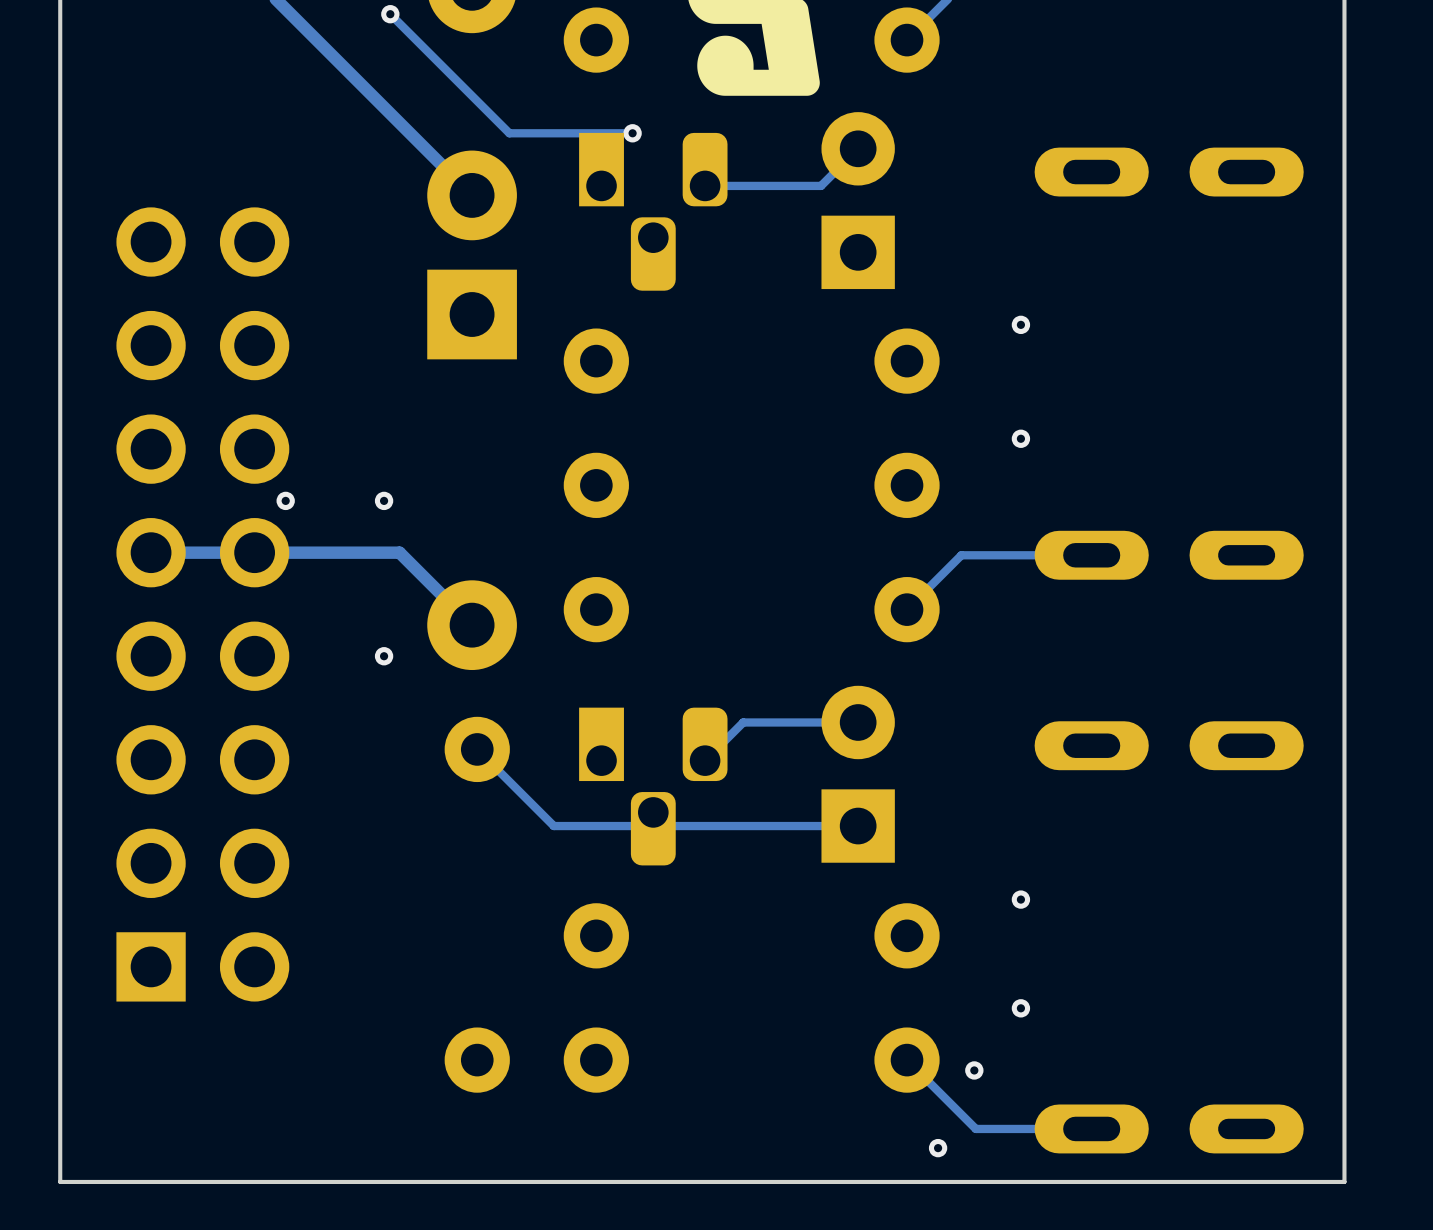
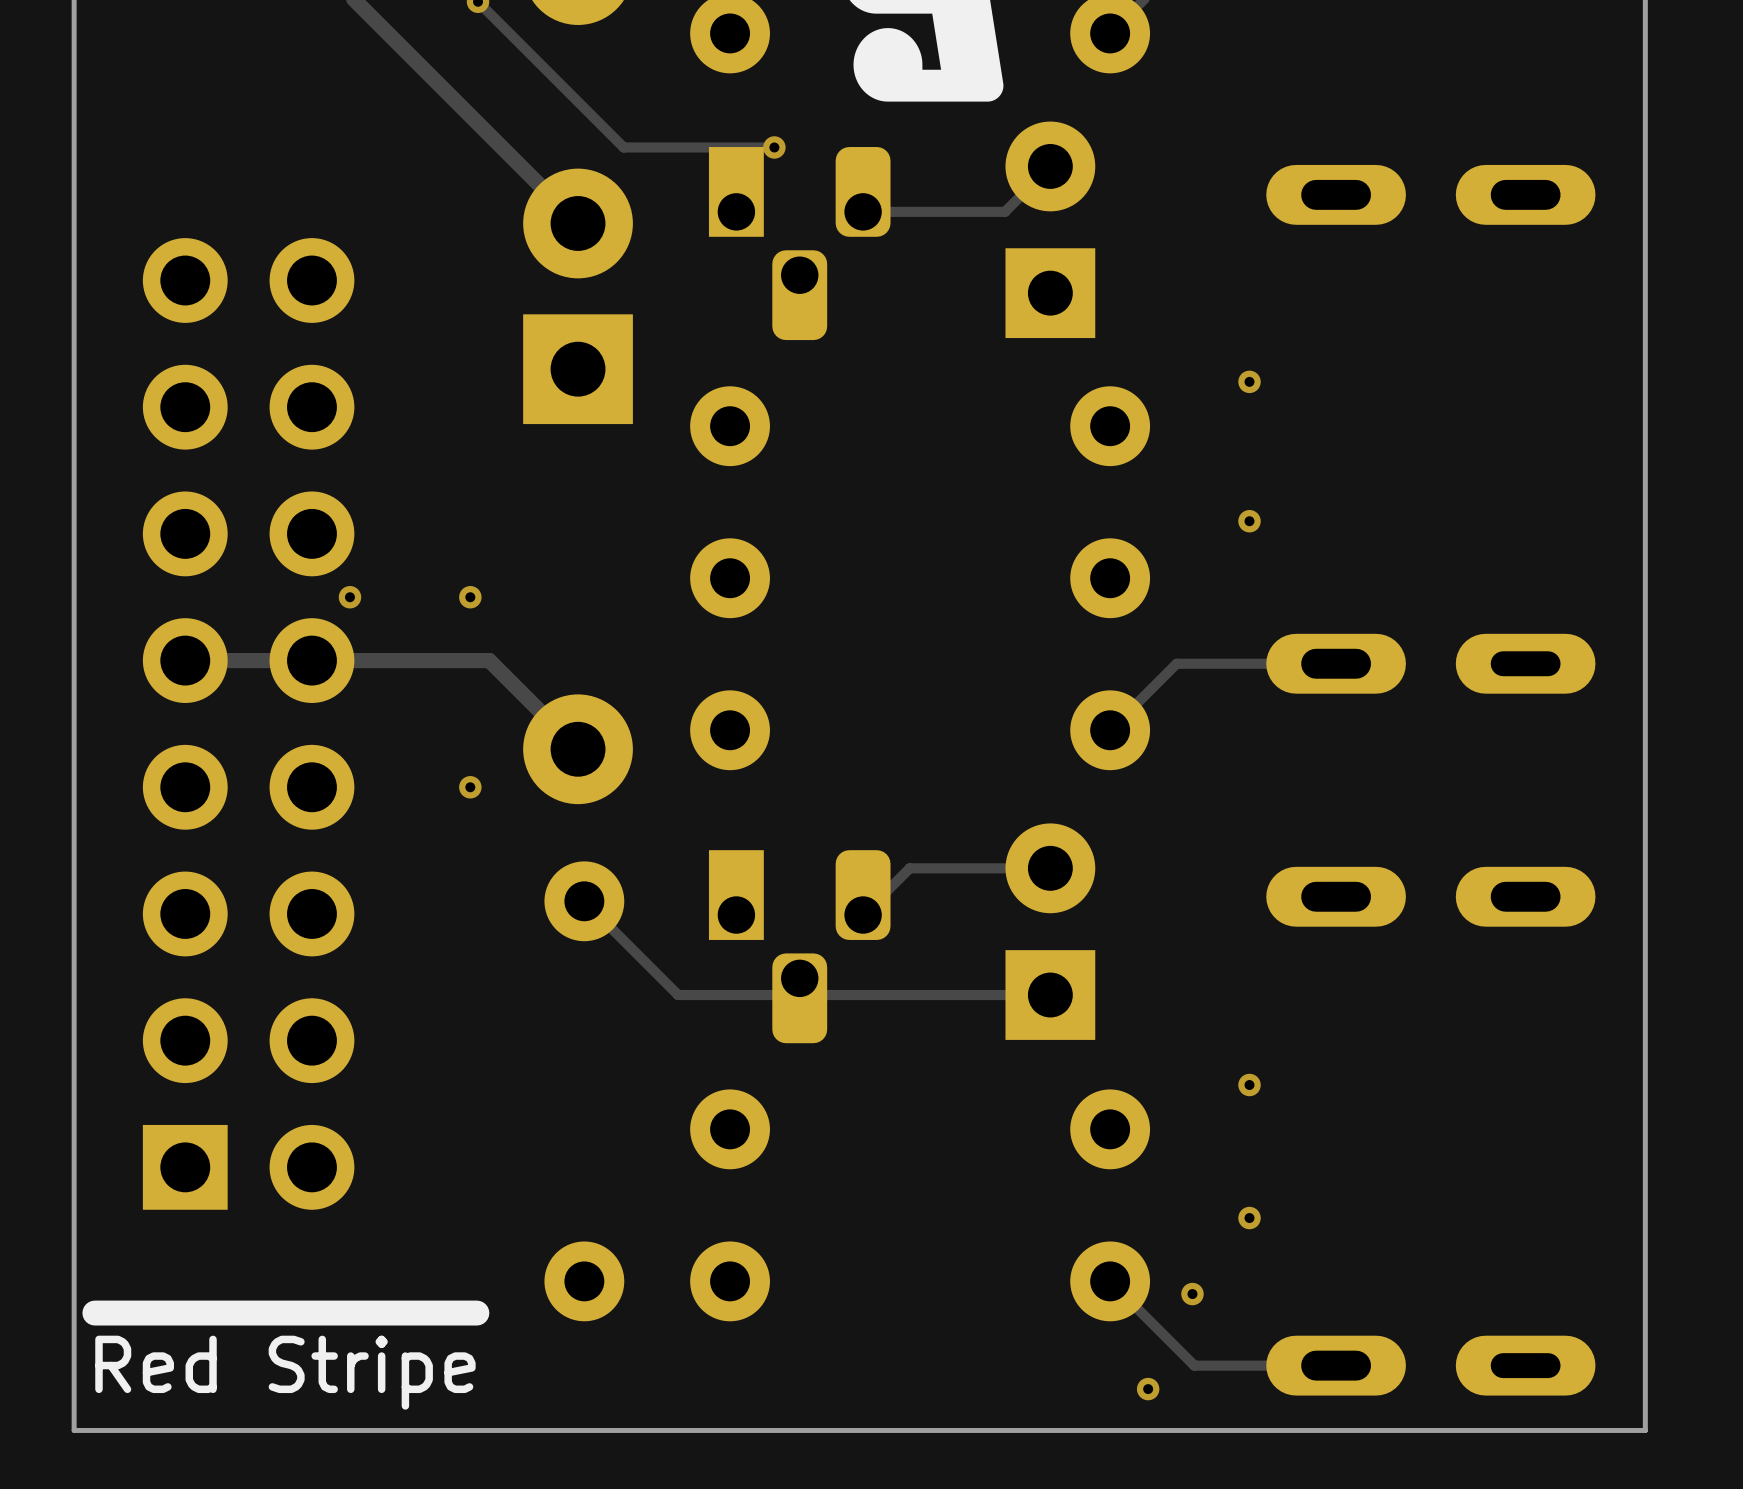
line: none -> (476, 1313) (94, 1313)
text: none -> Red Stripe (285, 1372)

